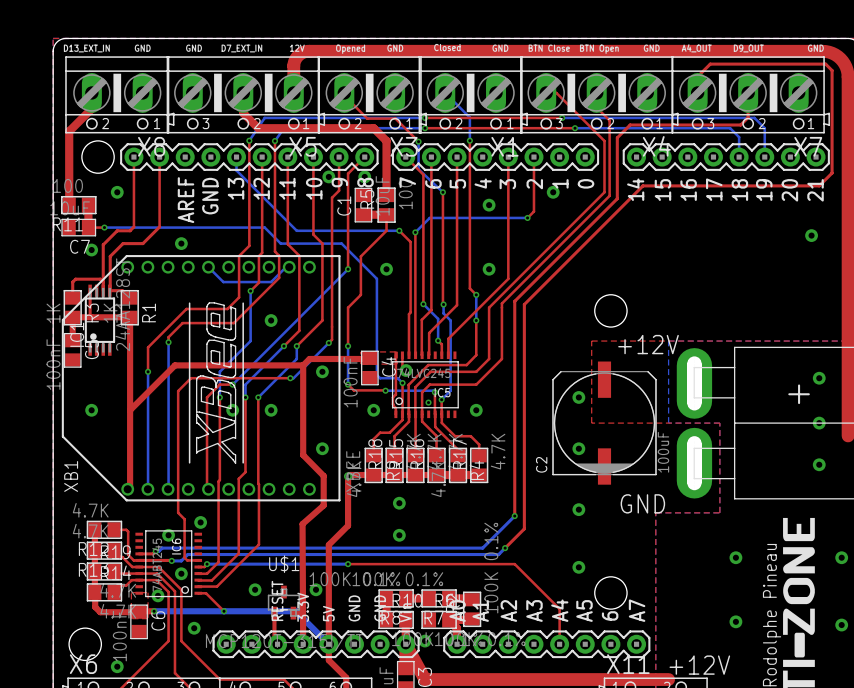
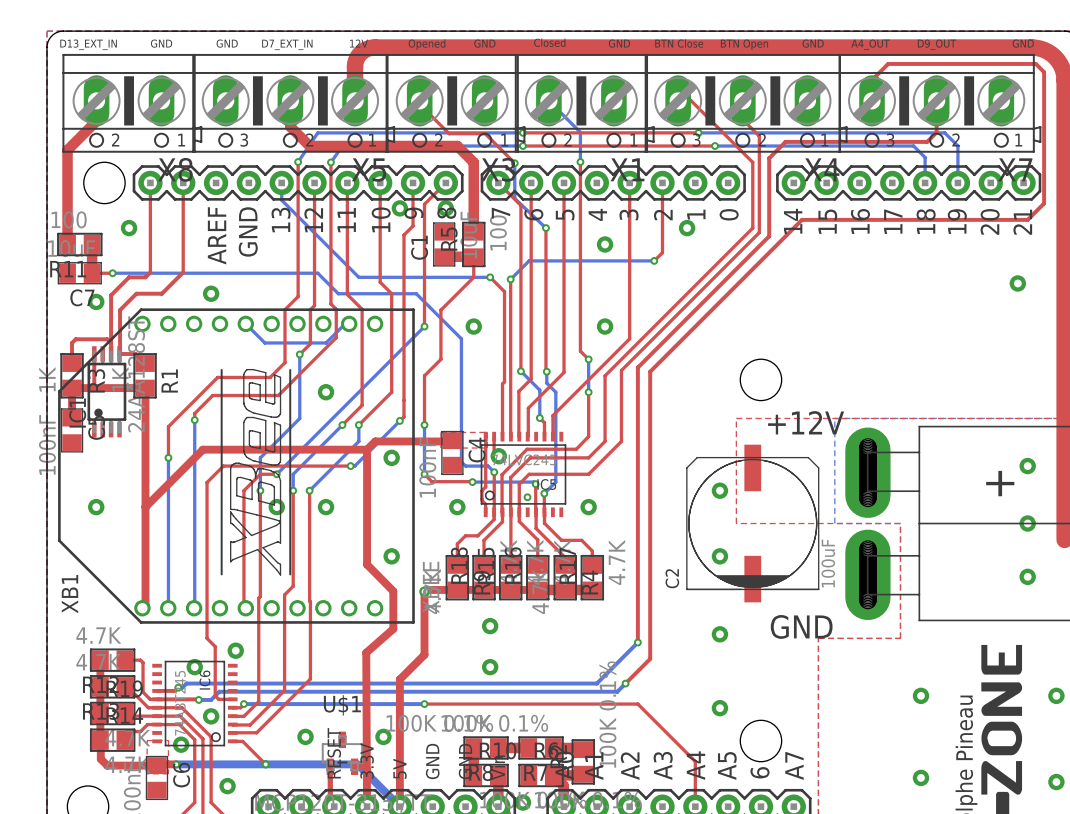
C2 footprint: [552, 361, 657, 485] -> [686, 444, 820, 603]

